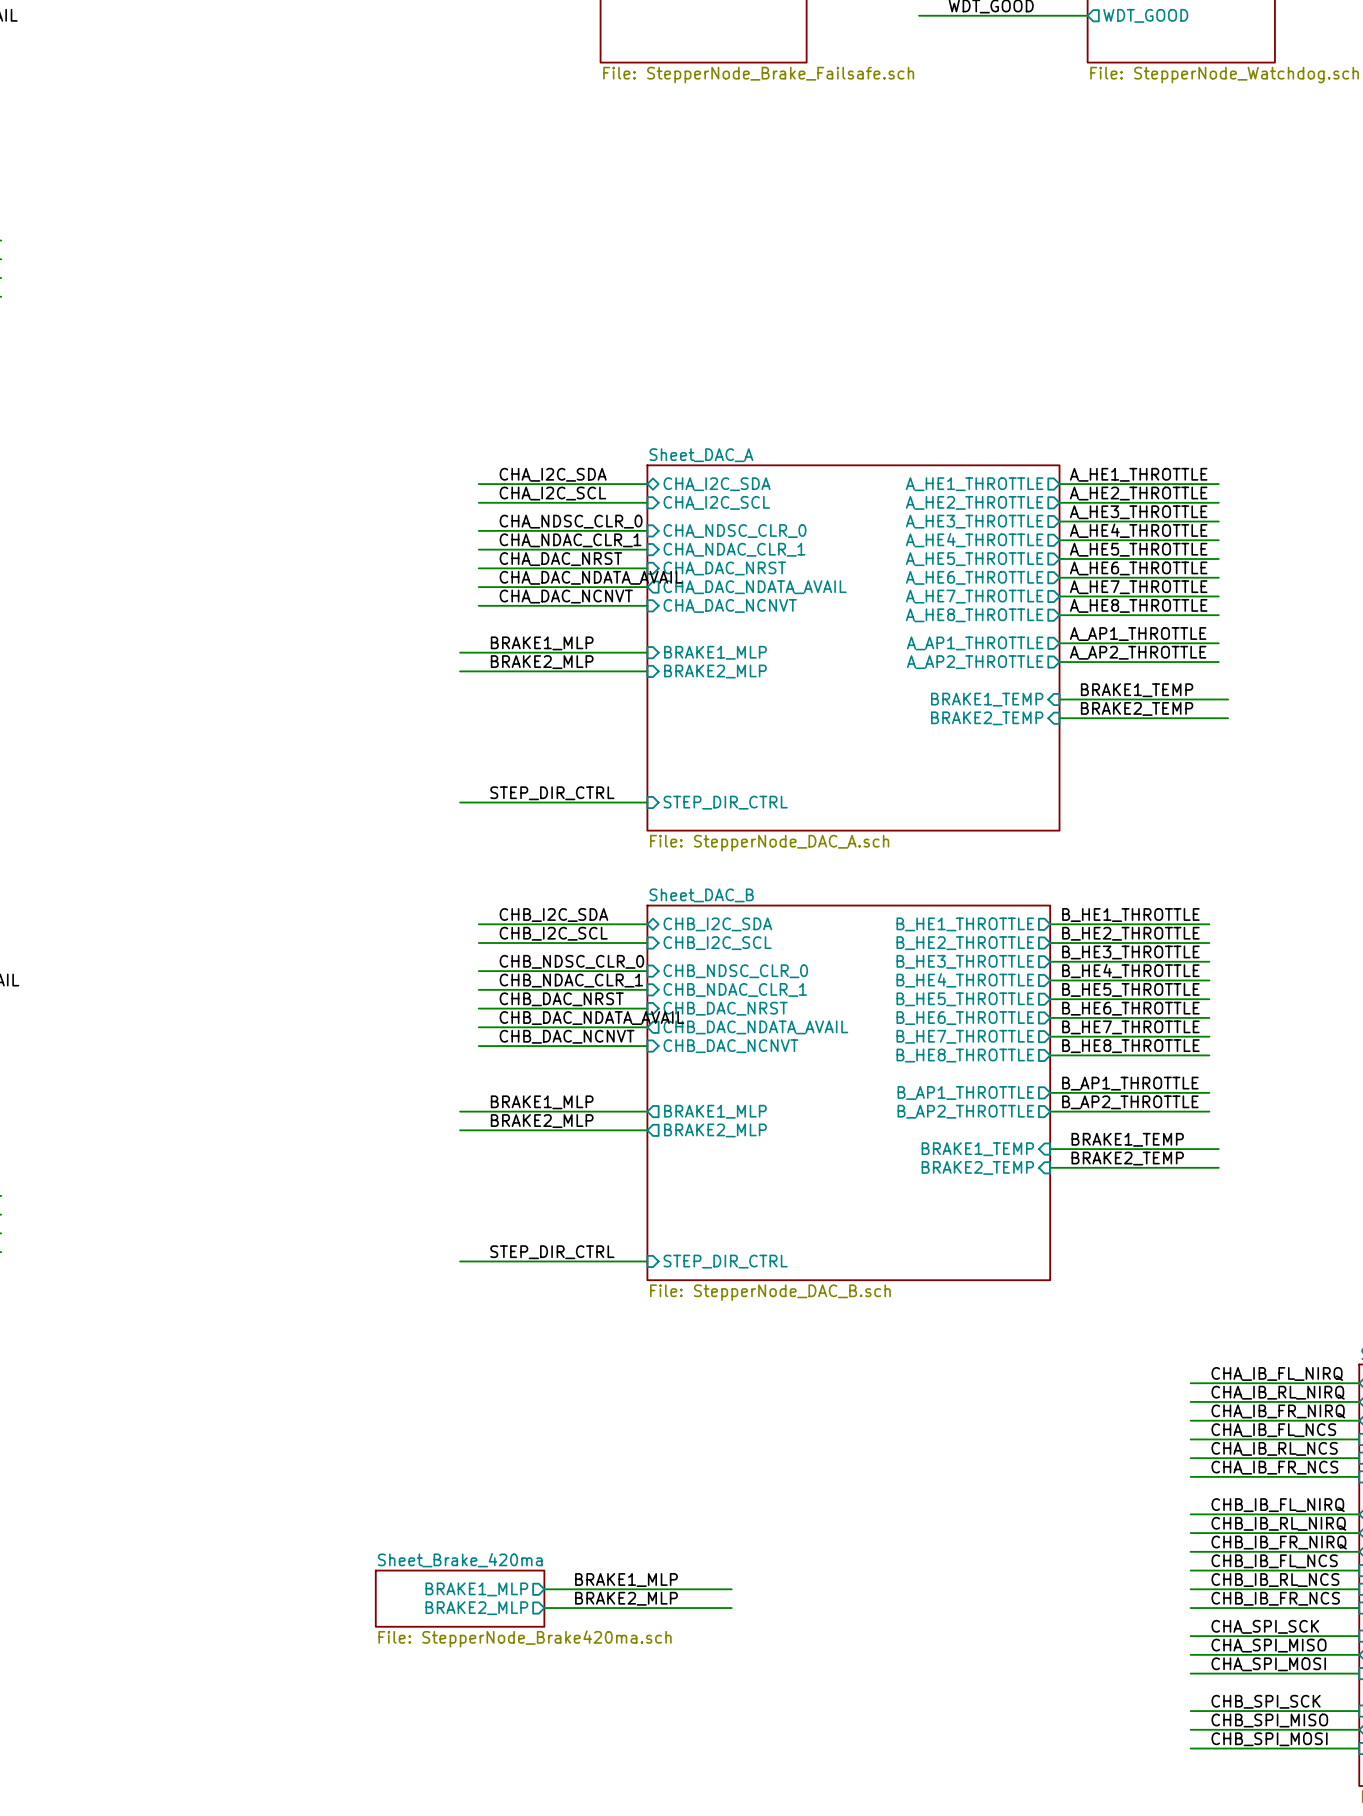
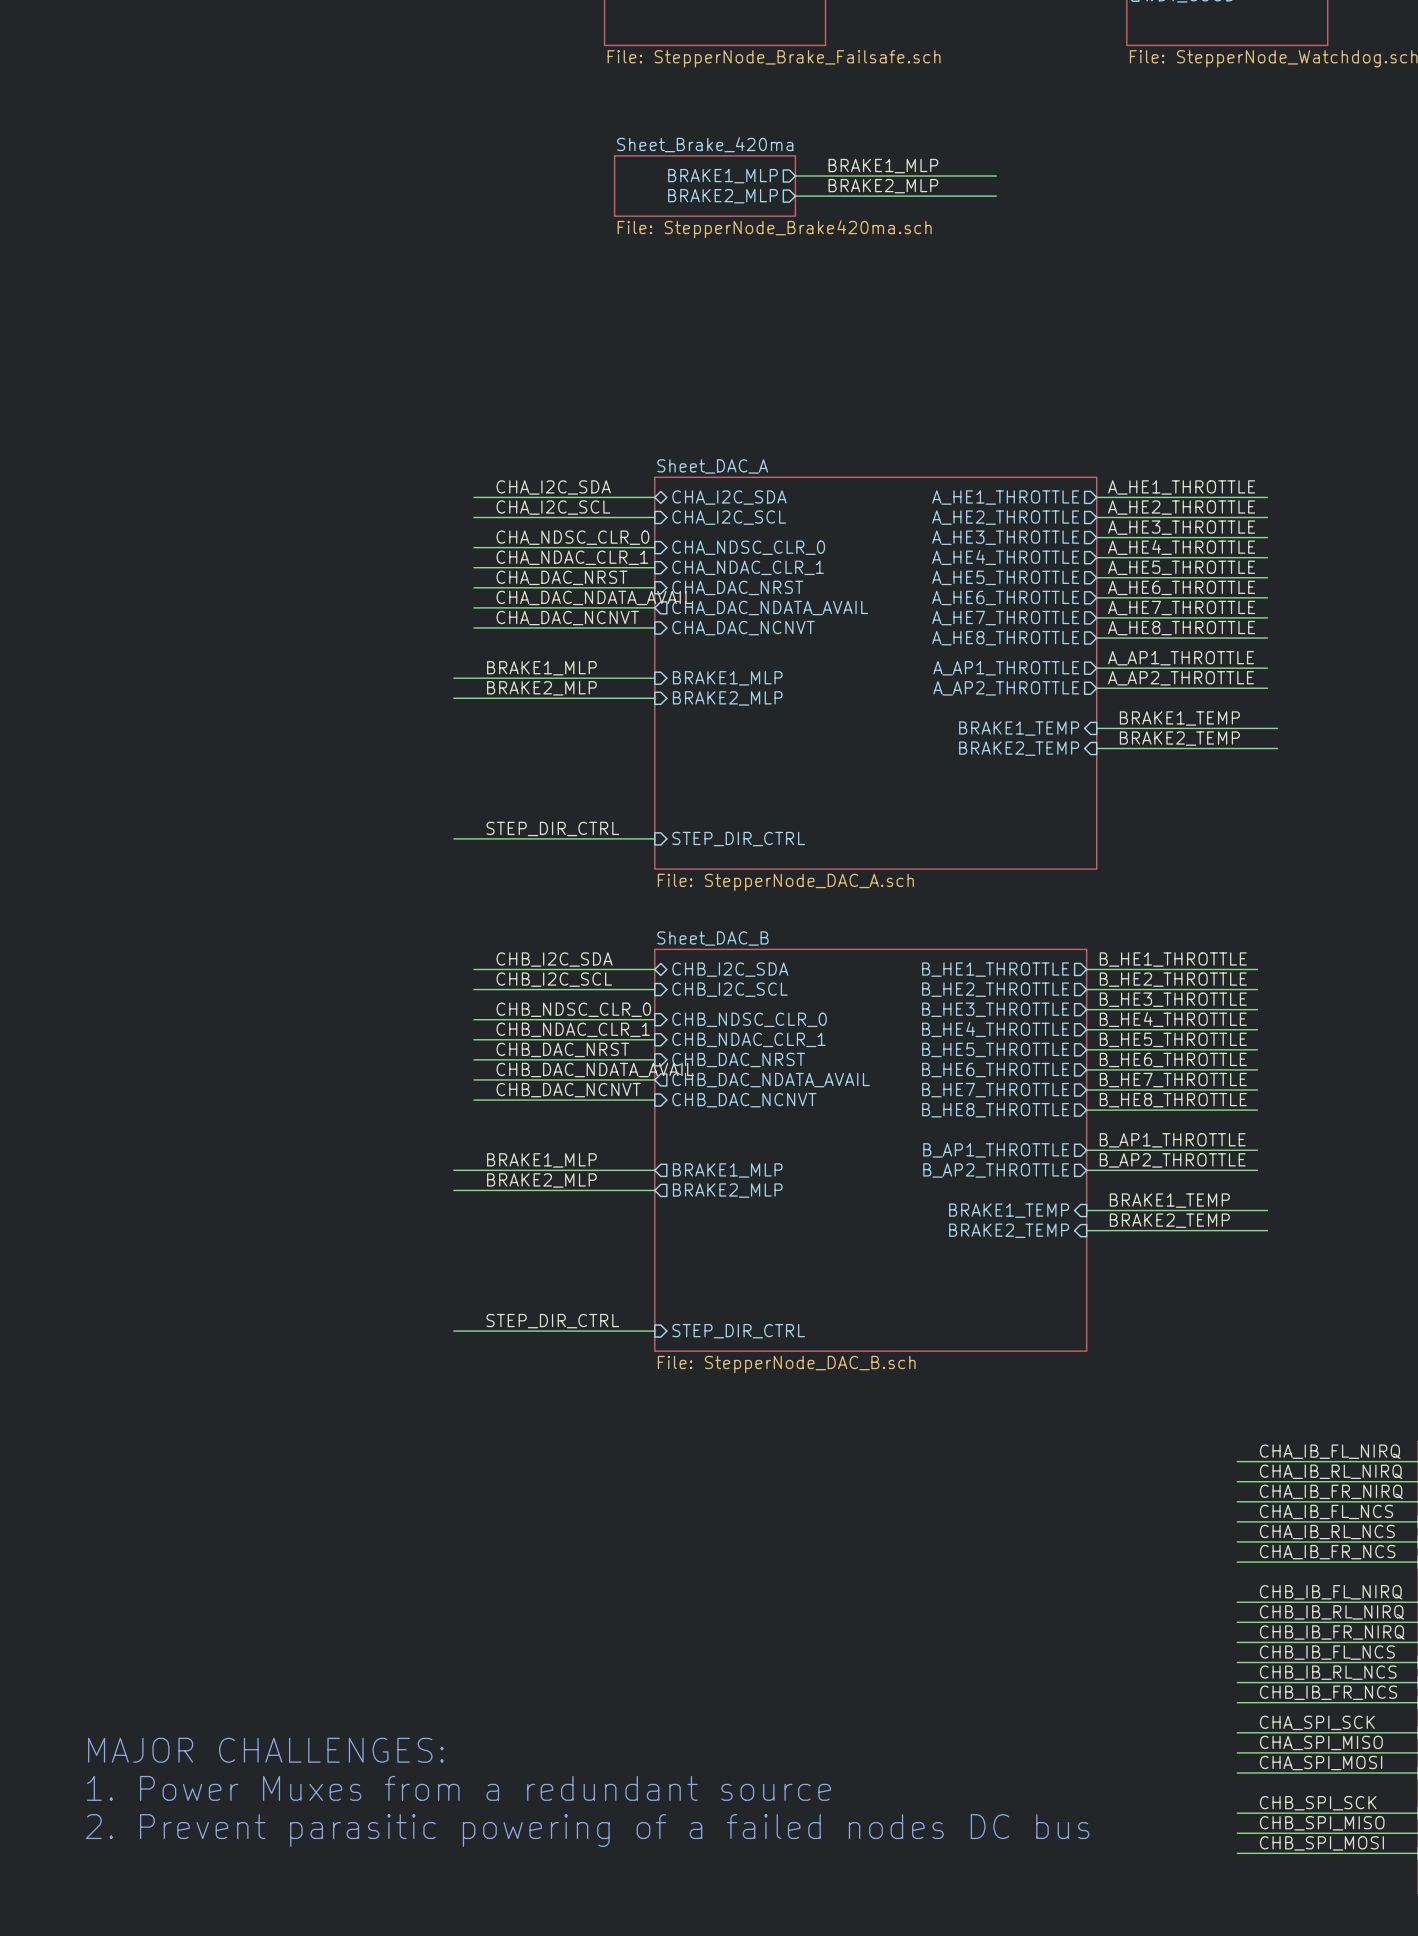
label: none -> BRAKE1_MLP (883, 166)
sheet pin: none -> BRAKE1_MLP (723, 176)
wire: none -> (795, 176) (996, 176)
label: none -> BRAKE2_MLP (883, 186)
sheet pin: none -> BRAKE2_MLP (723, 196)
wire: none -> (795, 196) (996, 196)
label: BRAKE1_MLP (626, 1580) -> none
sheet pin: BRAKE1_MLP (476, 1589) -> none
wire: (544, 1589) (731, 1589) -> none
sheet Sheet_Brake_420ma position: (460, 1598) -> (705, 186)
label: BRAKE2_MLP (626, 1598) -> none
sheet pin: BRAKE2_MLP (476, 1608) -> none
wire: (544, 1608) (731, 1608) -> none
text: none -> MAJOR CHALLENGES: (265, 1750)
text: none -> 1. Power Muxes from a redundant source (458, 1788)
text: none -> 2. Prevent parasitic powering of a failed nodes DC bus (587, 1830)

